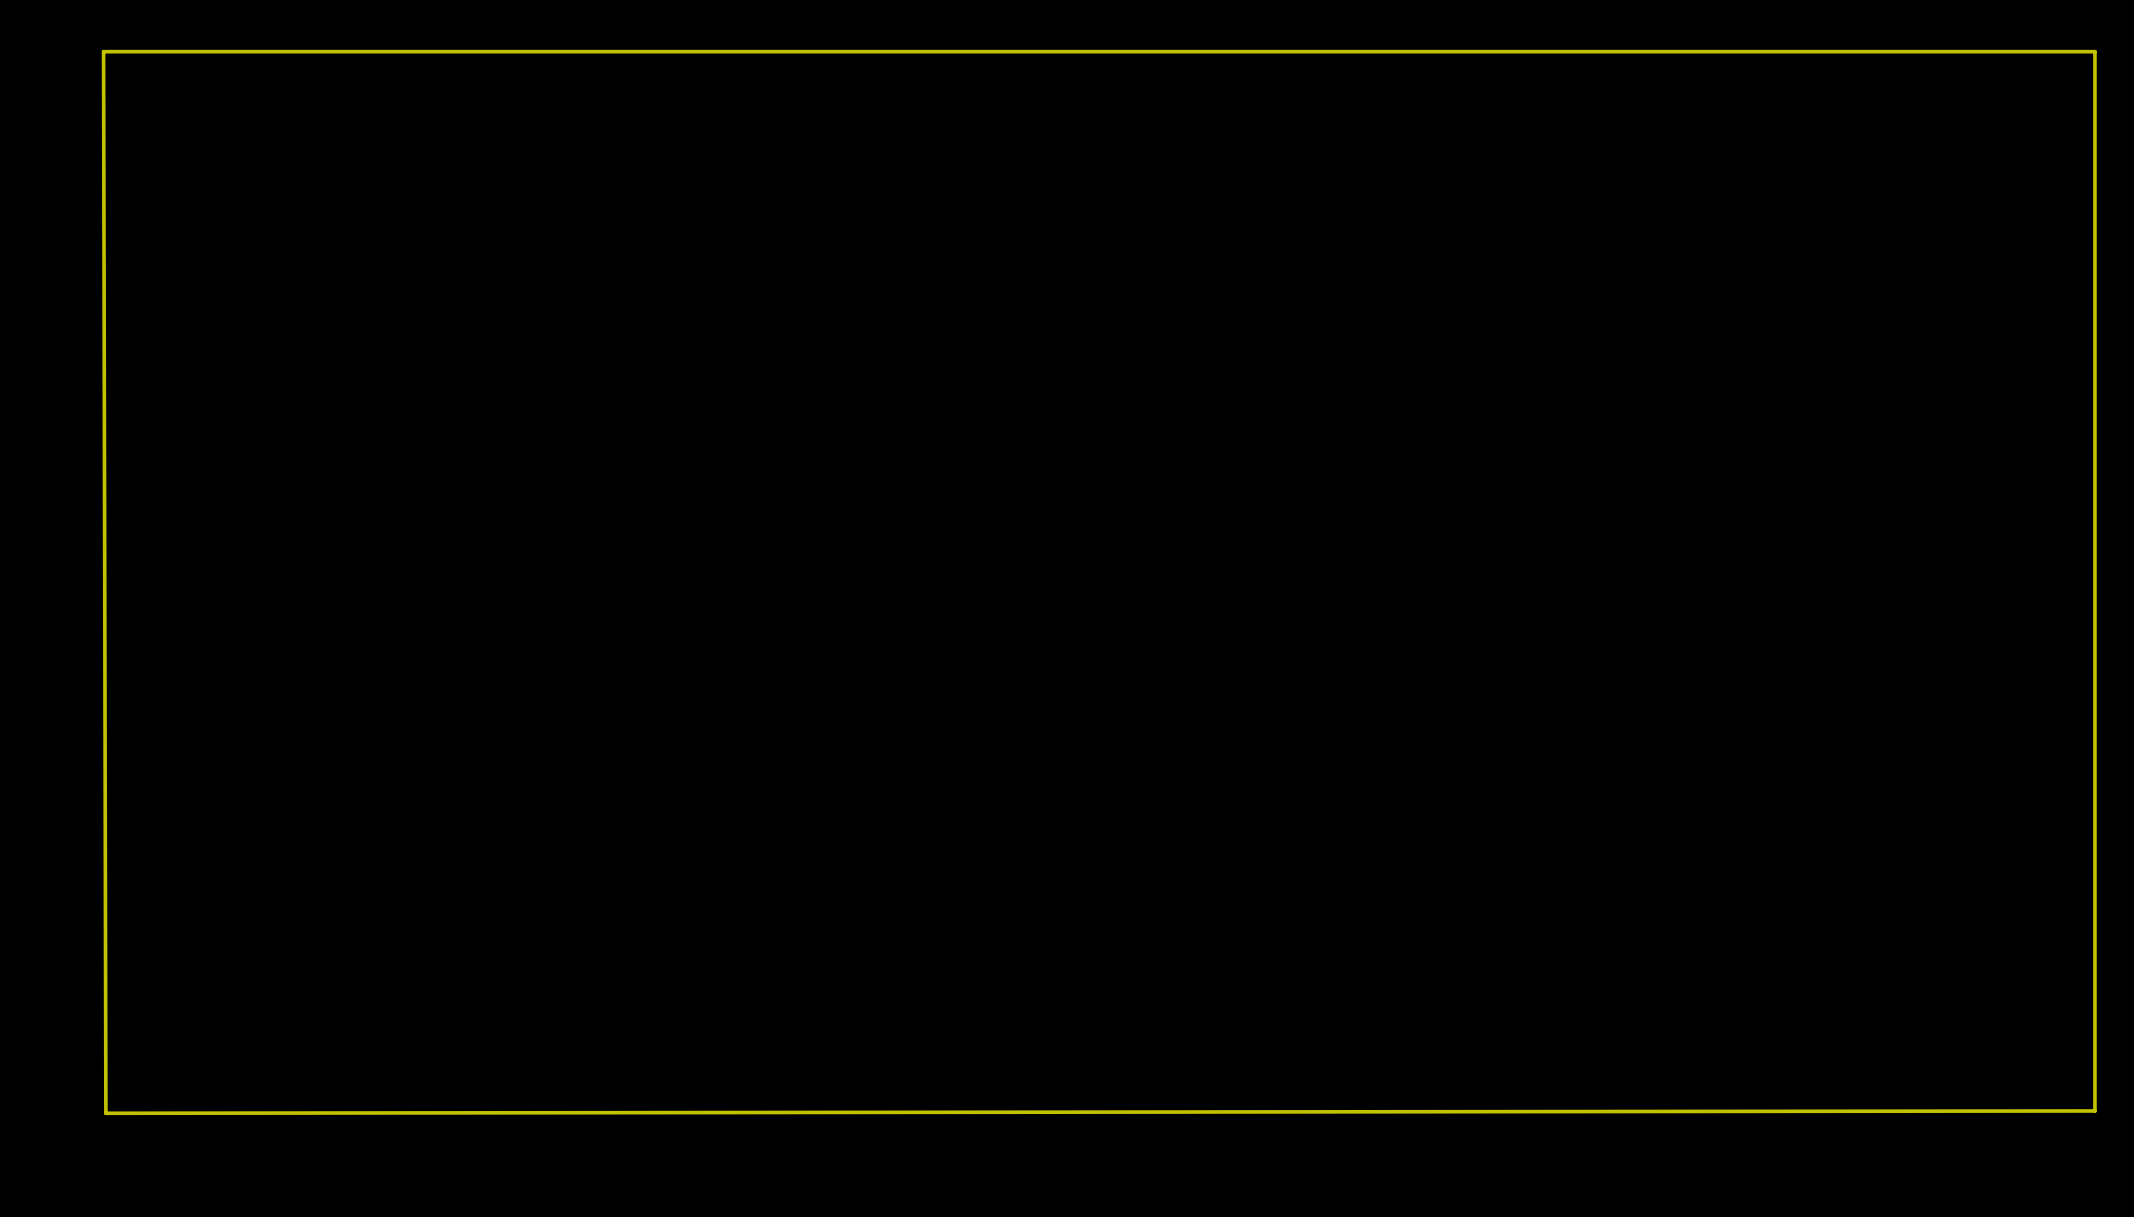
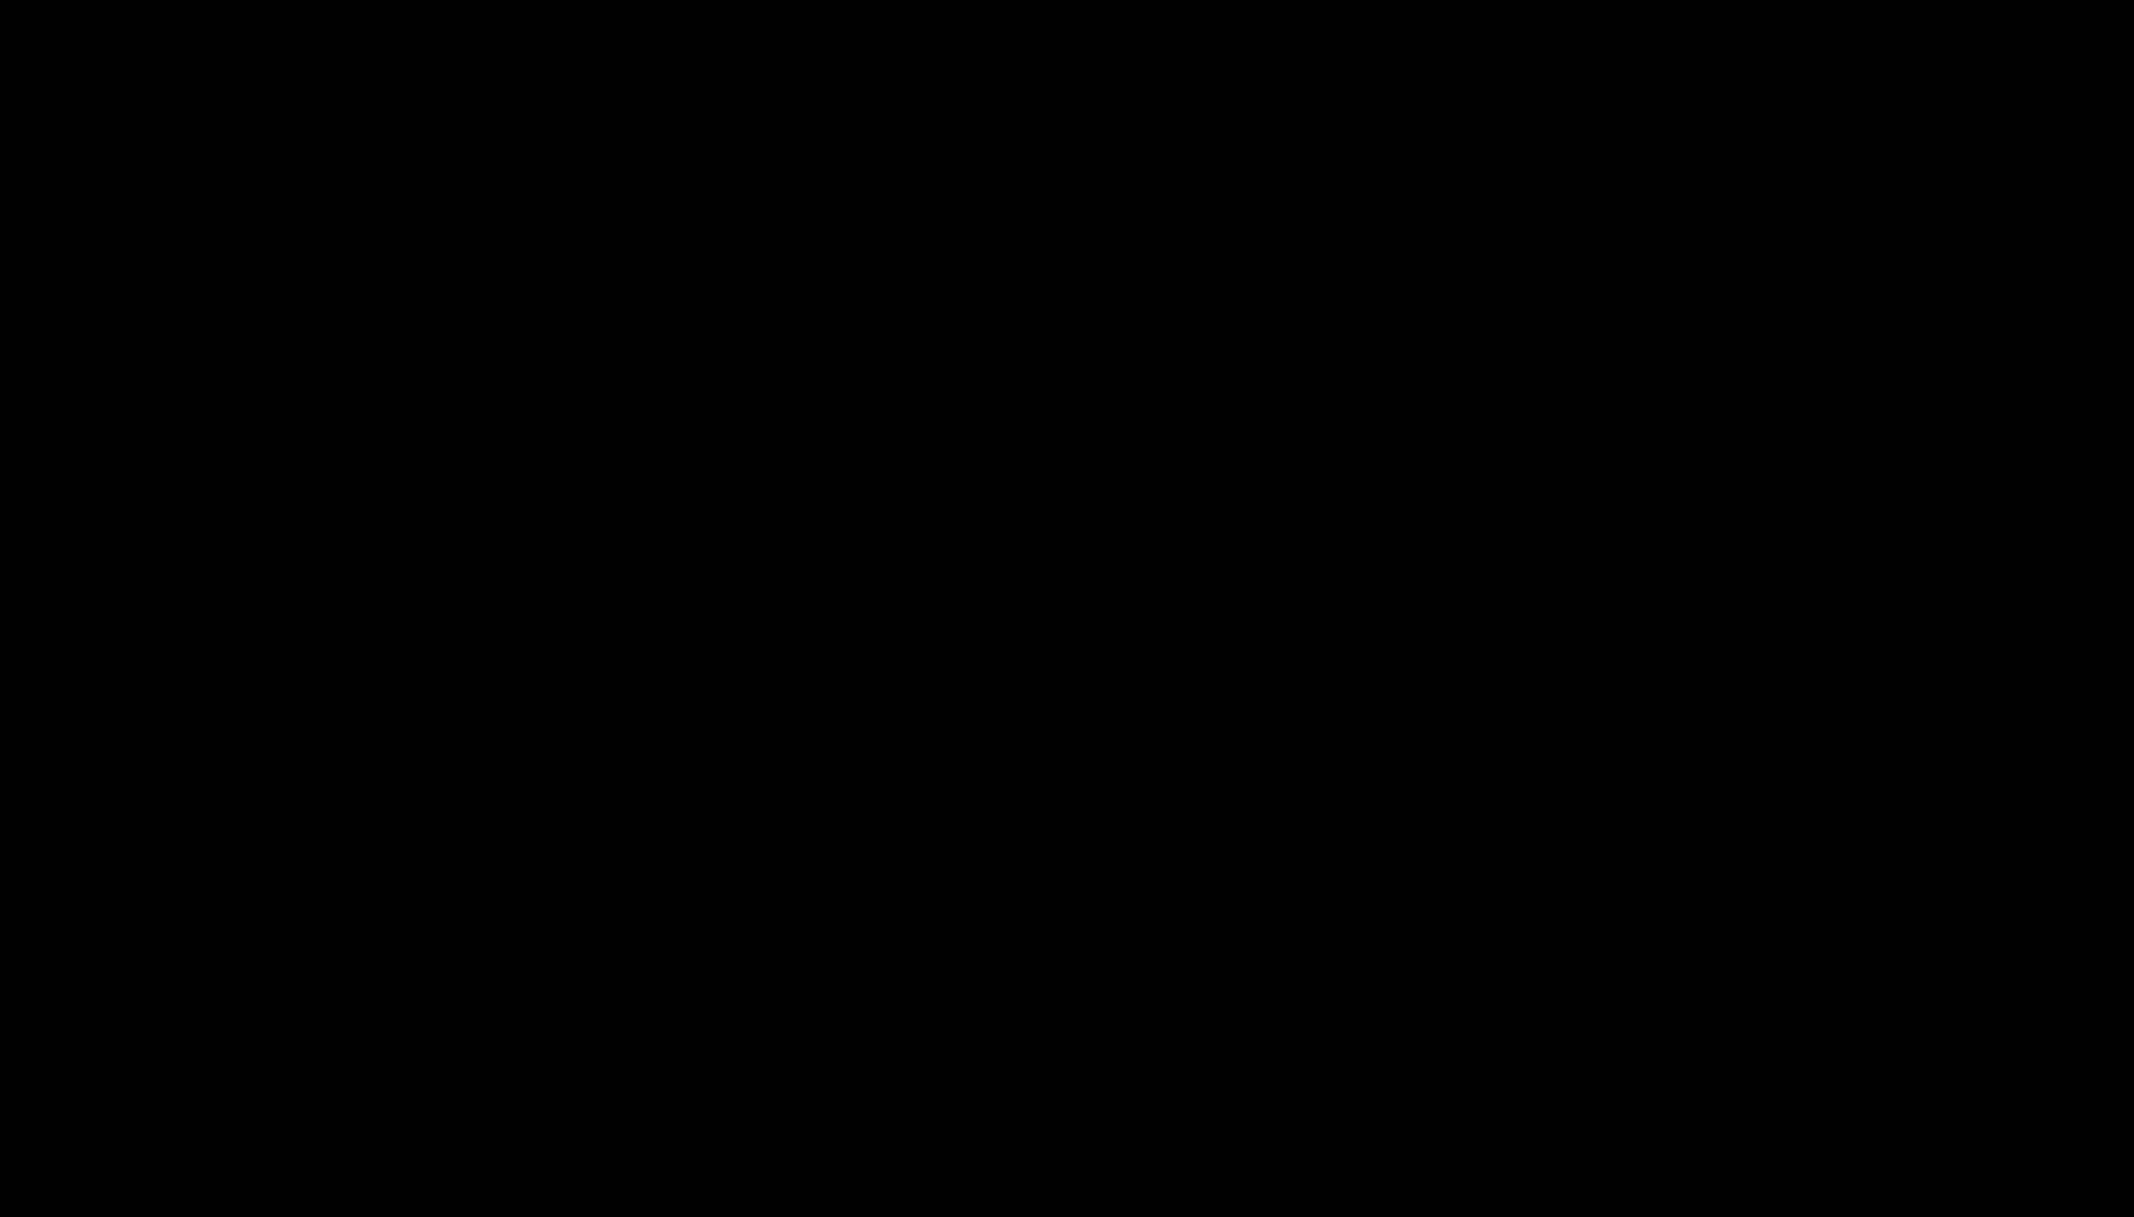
board edge: (103, 51) (105, 1113) (2094, 1110) (2094, 51) (103, 51) -> none

